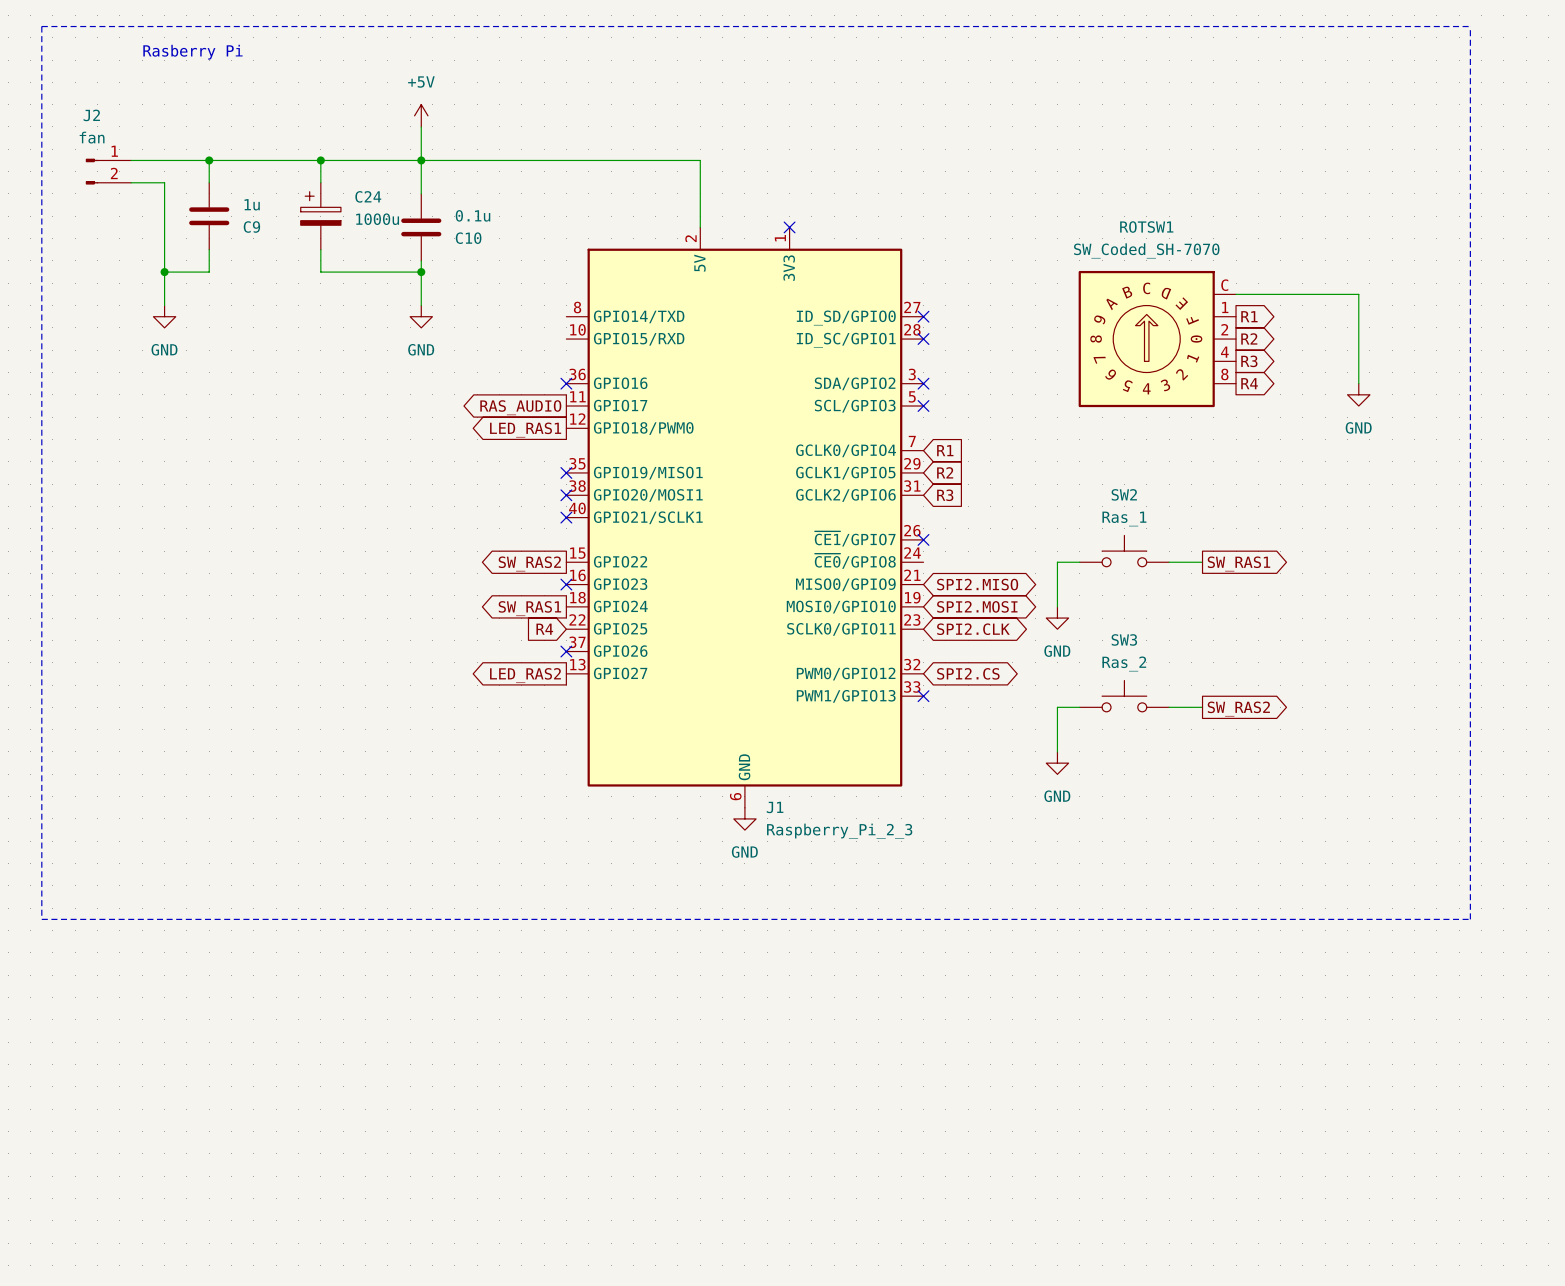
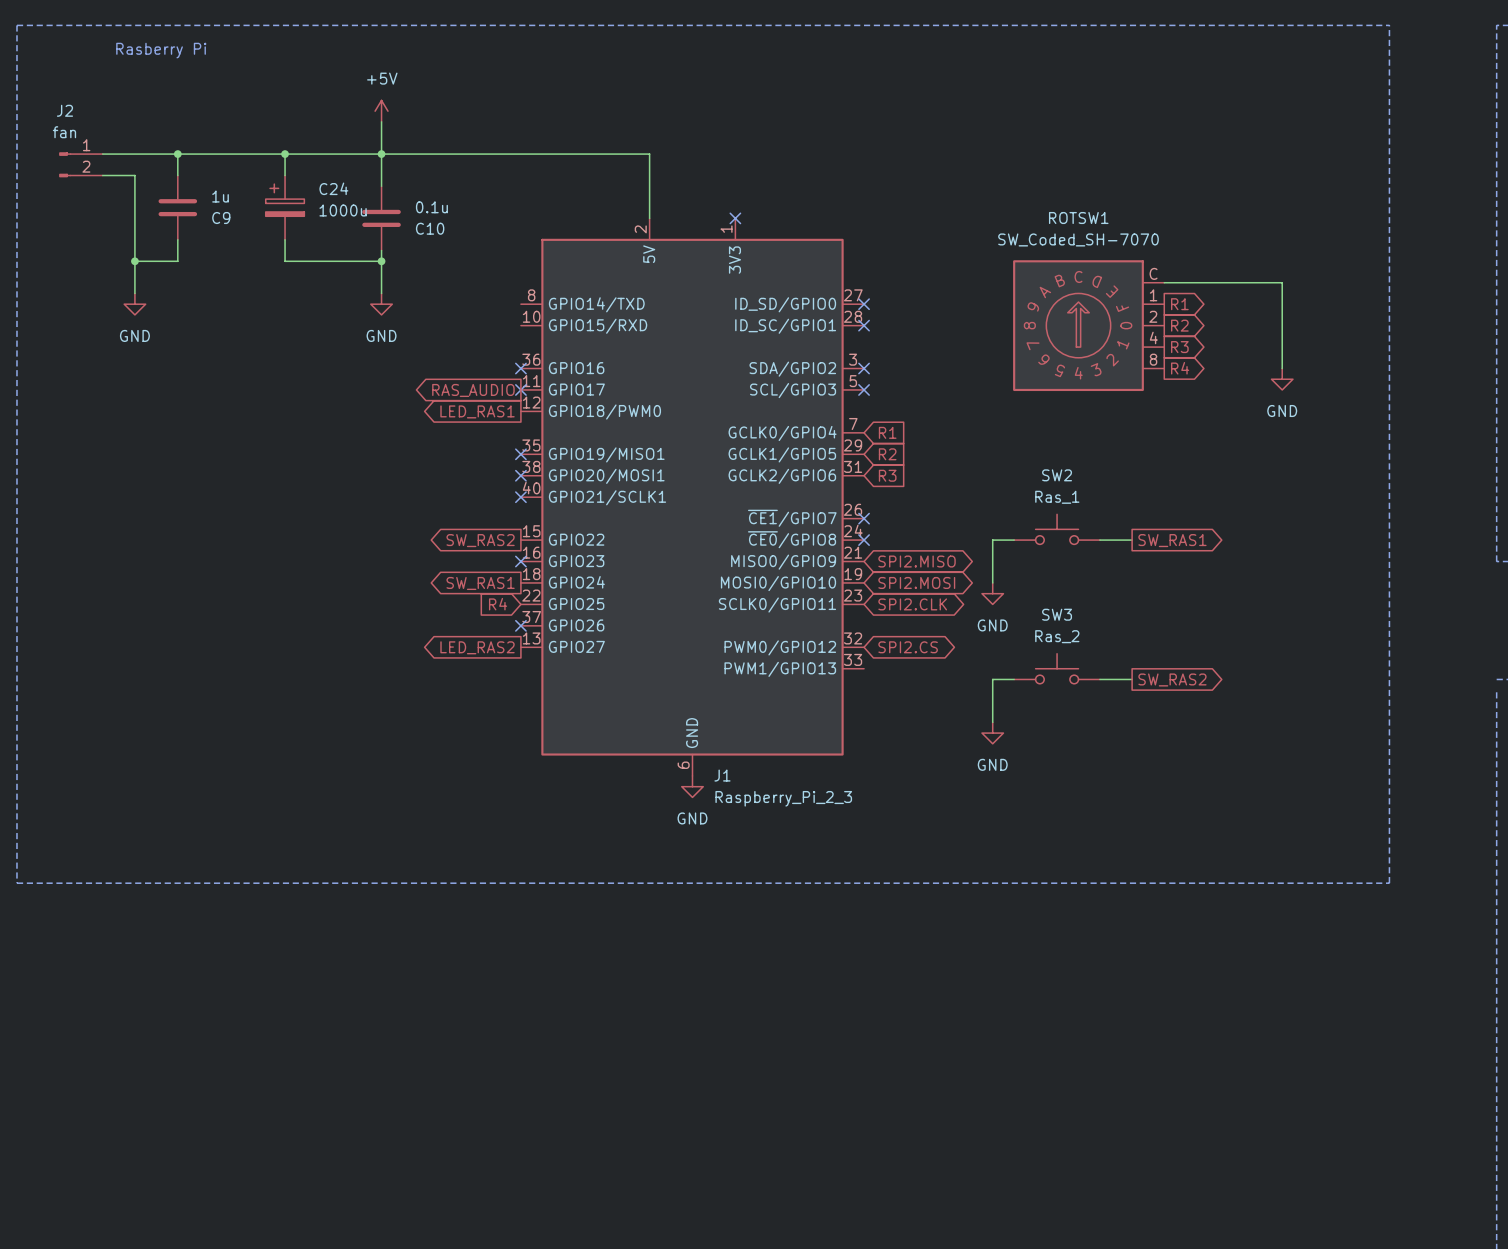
no-connect mark: none -> (520, 389)
no-connect mark: none -> (864, 540)
no-connect mark: (923, 696) -> none

